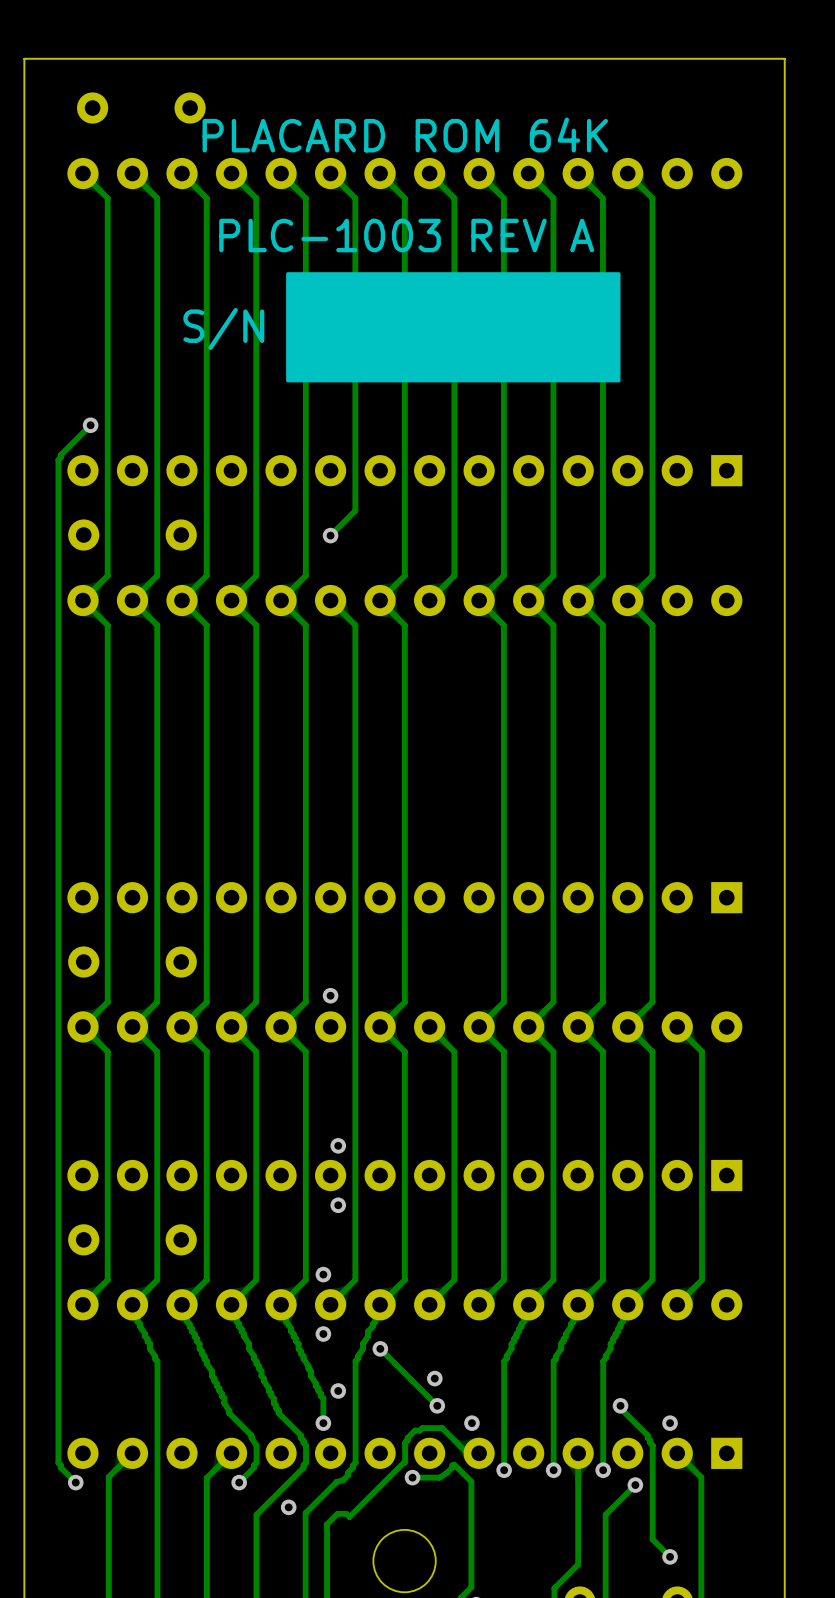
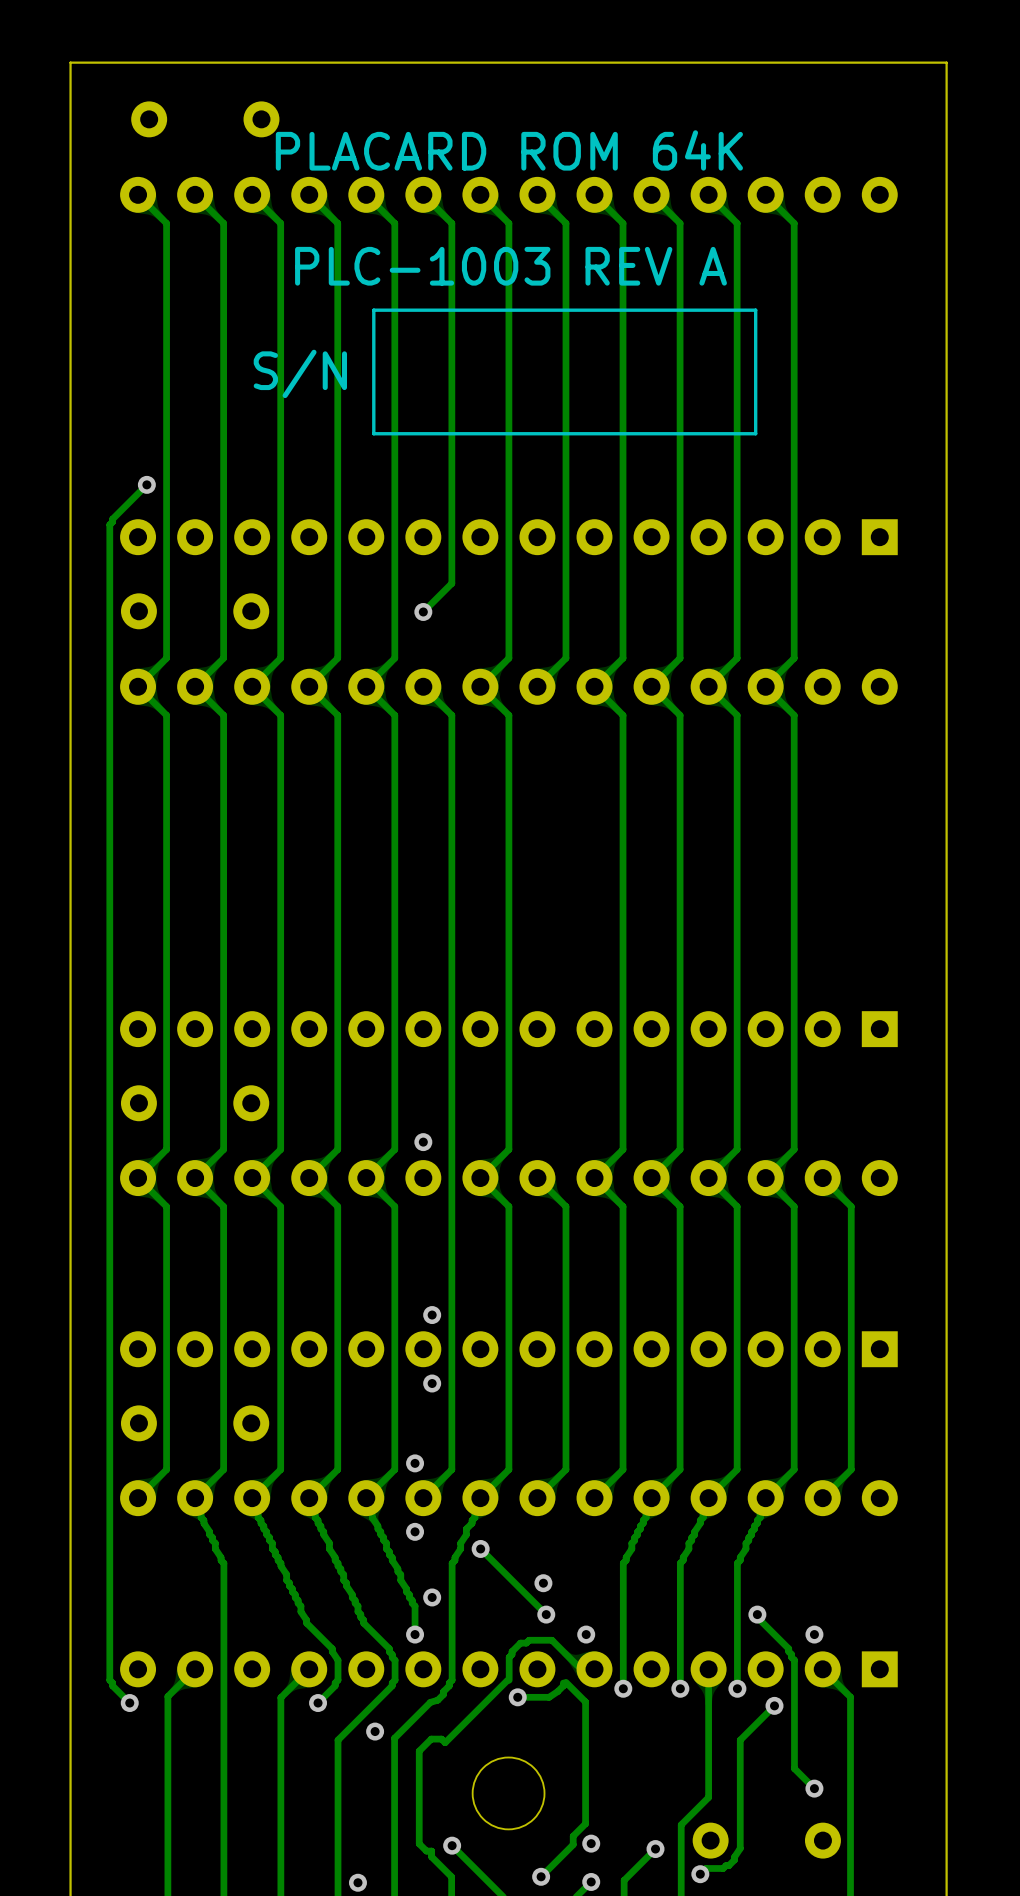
drawing: [286, 272, 621, 383] -> none
line: none -> (755, 310) (373, 310) (373, 433) (755, 433) (755, 310)

